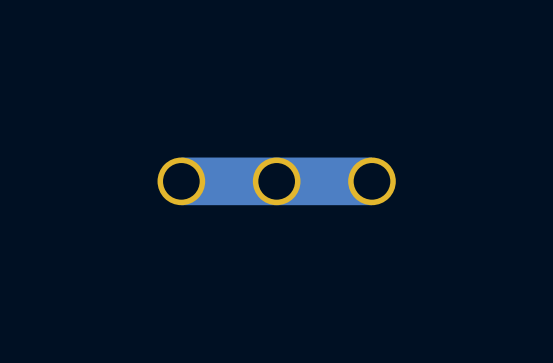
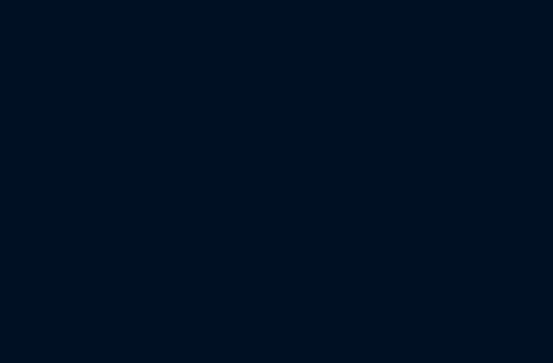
part: (276, 181) -> none

